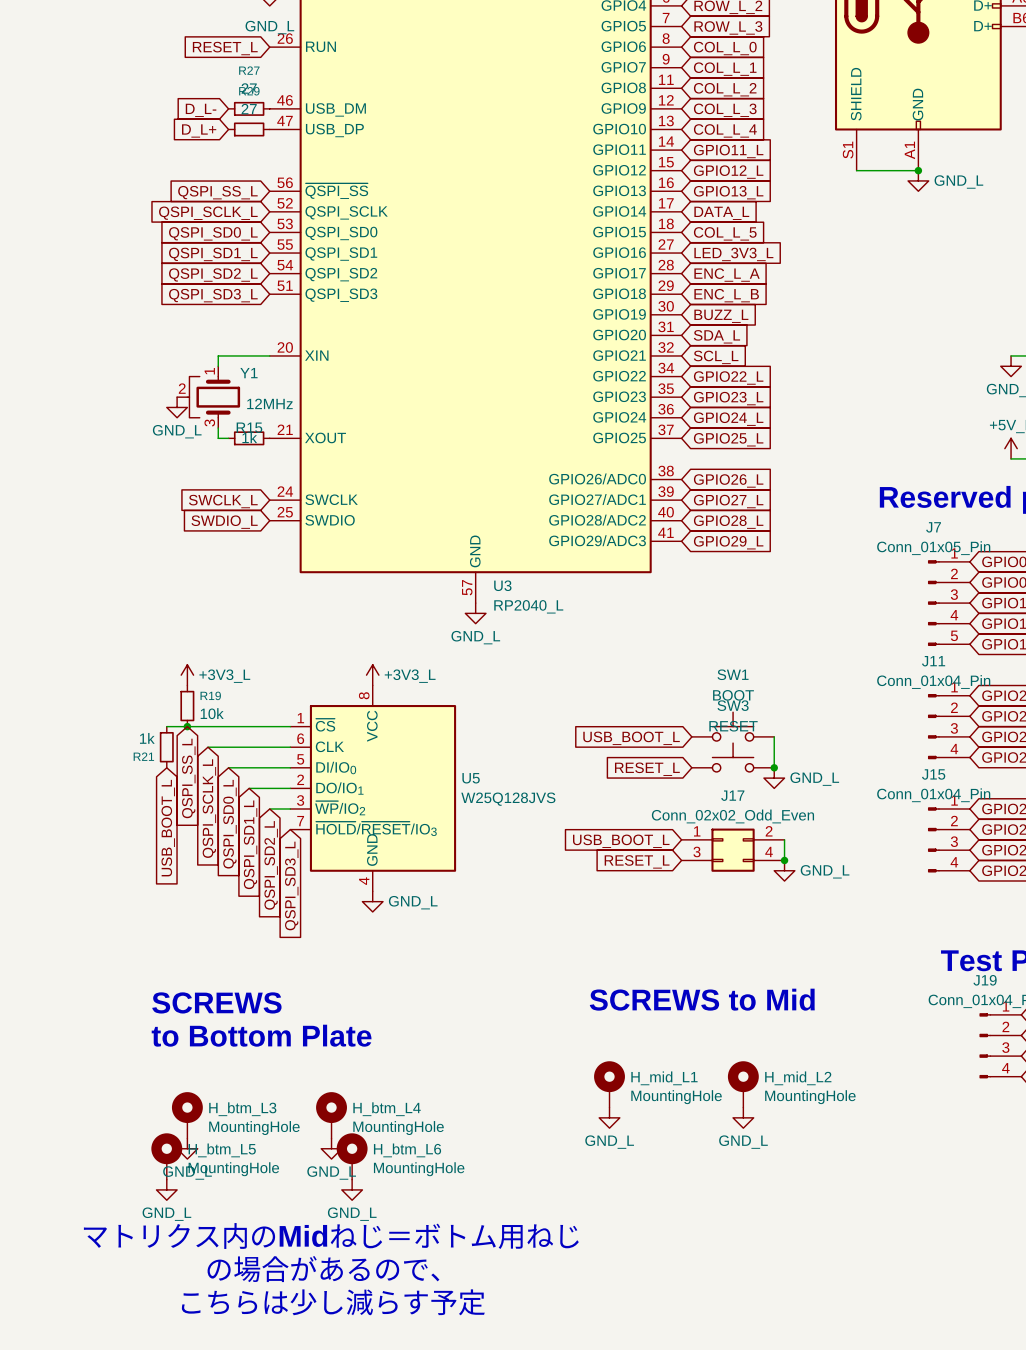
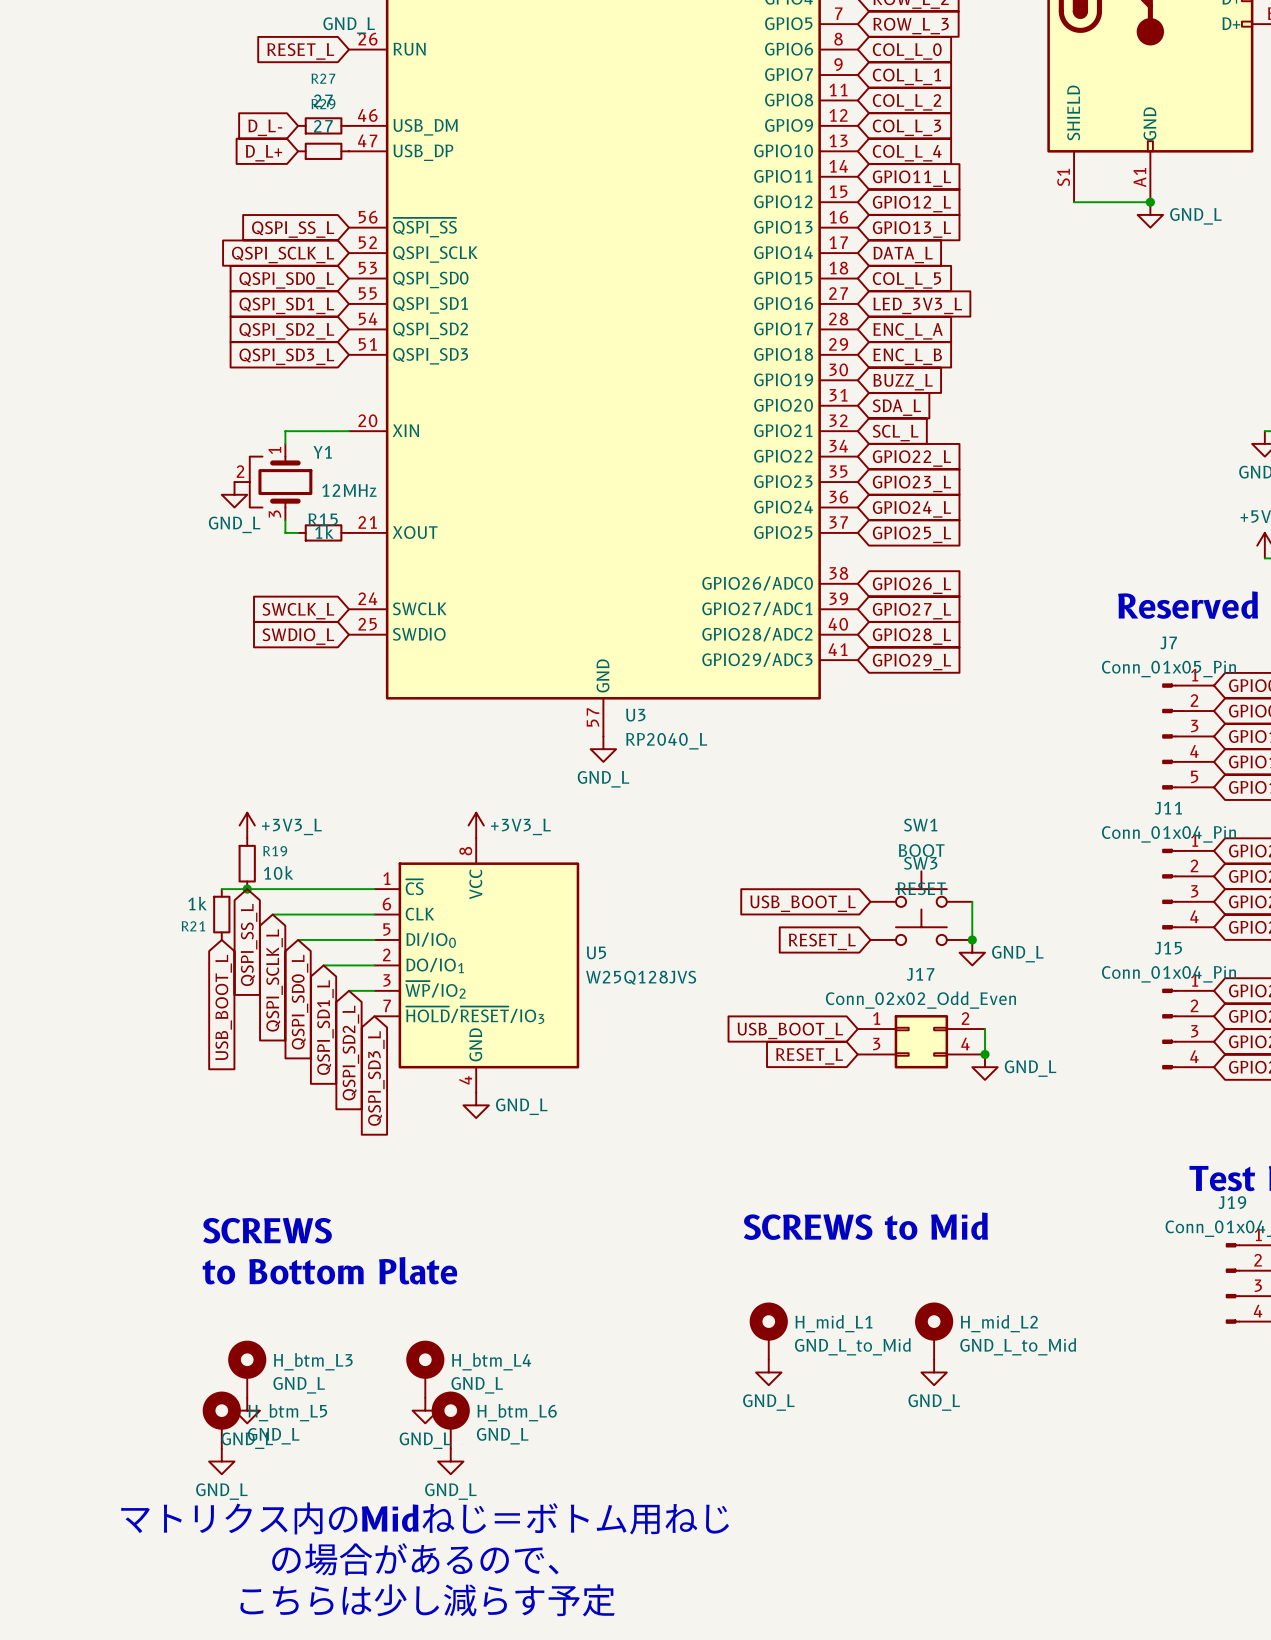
H_mid_L1 value: MountingHole (676, 1097) -> GND_L_to_Mid (852, 1346)
H_mid_L2 value: MountingHole (810, 1097) -> GND_L_to_Mid (1018, 1346)
H_btm_L3 value: MountingHole (254, 1128) -> GND_L (299, 1385)
H_btm_L4 value: MountingHole (398, 1128) -> GND_L (477, 1385)
H_btm_L5 value: MountingHole (233, 1169) -> GND_L (273, 1436)
H_btm_L6 value: MountingHole (419, 1169) -> GND_L (502, 1436)

